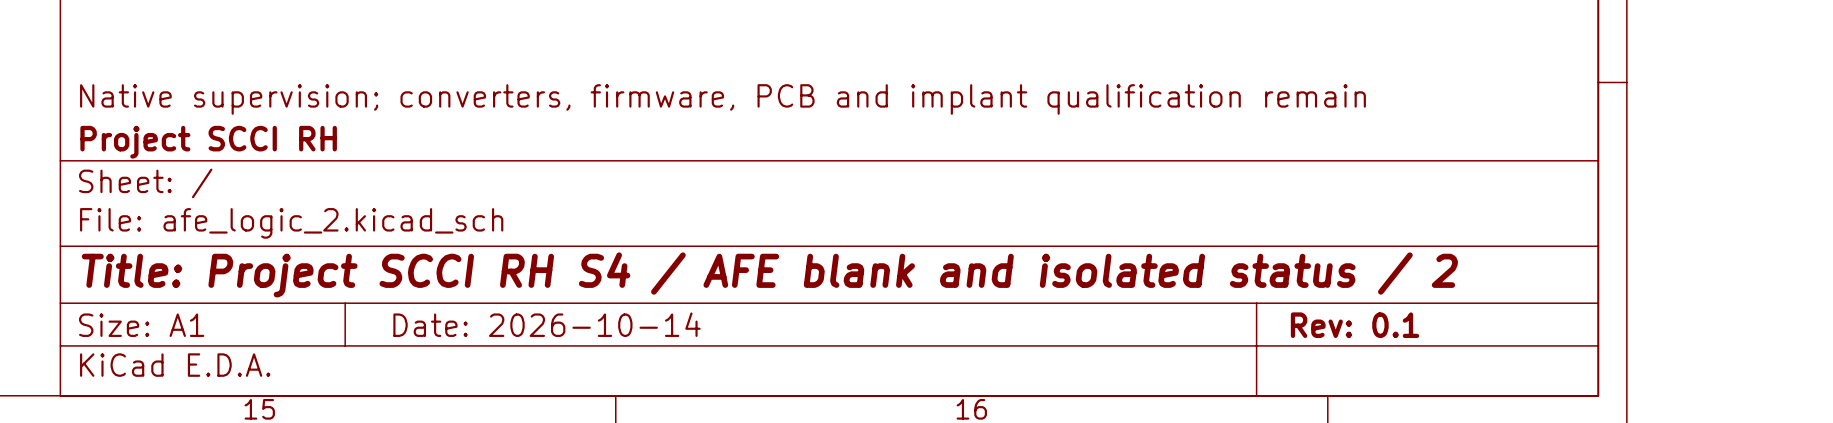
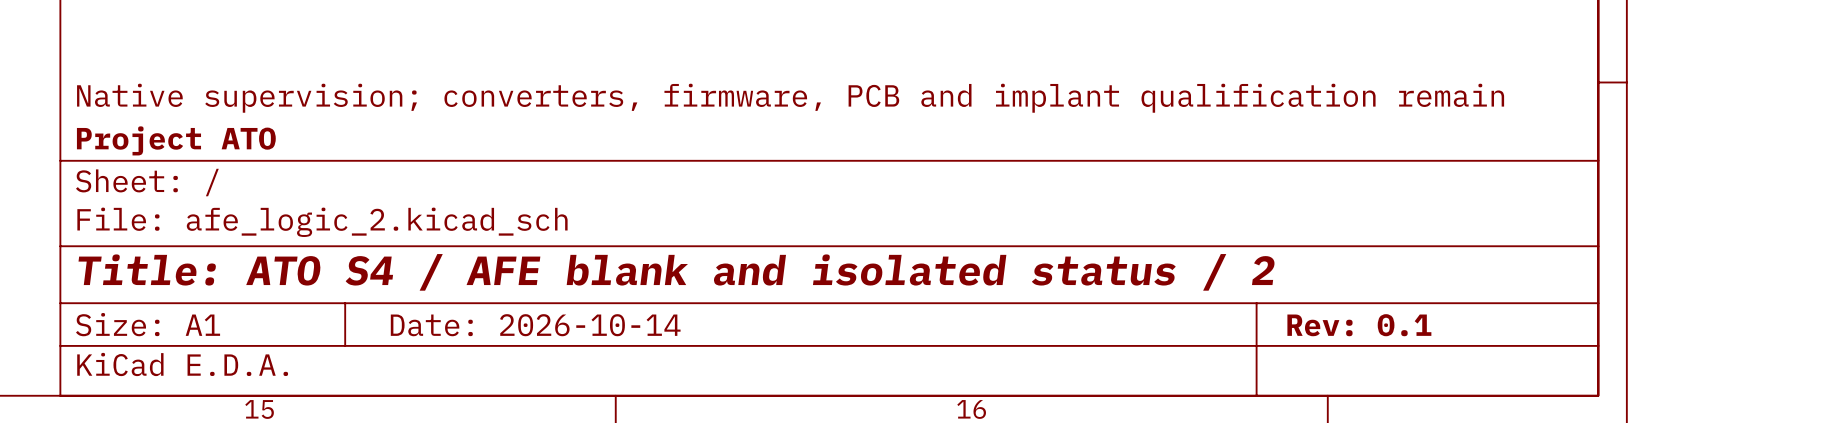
title block: Project SCCI RH (208, 142) -> Project ATO (176, 140)
title block: Title: Project SCCI RH S4 / AFE blank and isolated status / 2 (769, 274) -> Title: ATO S4 / AFE blank and isolated status / 2 (676, 272)

